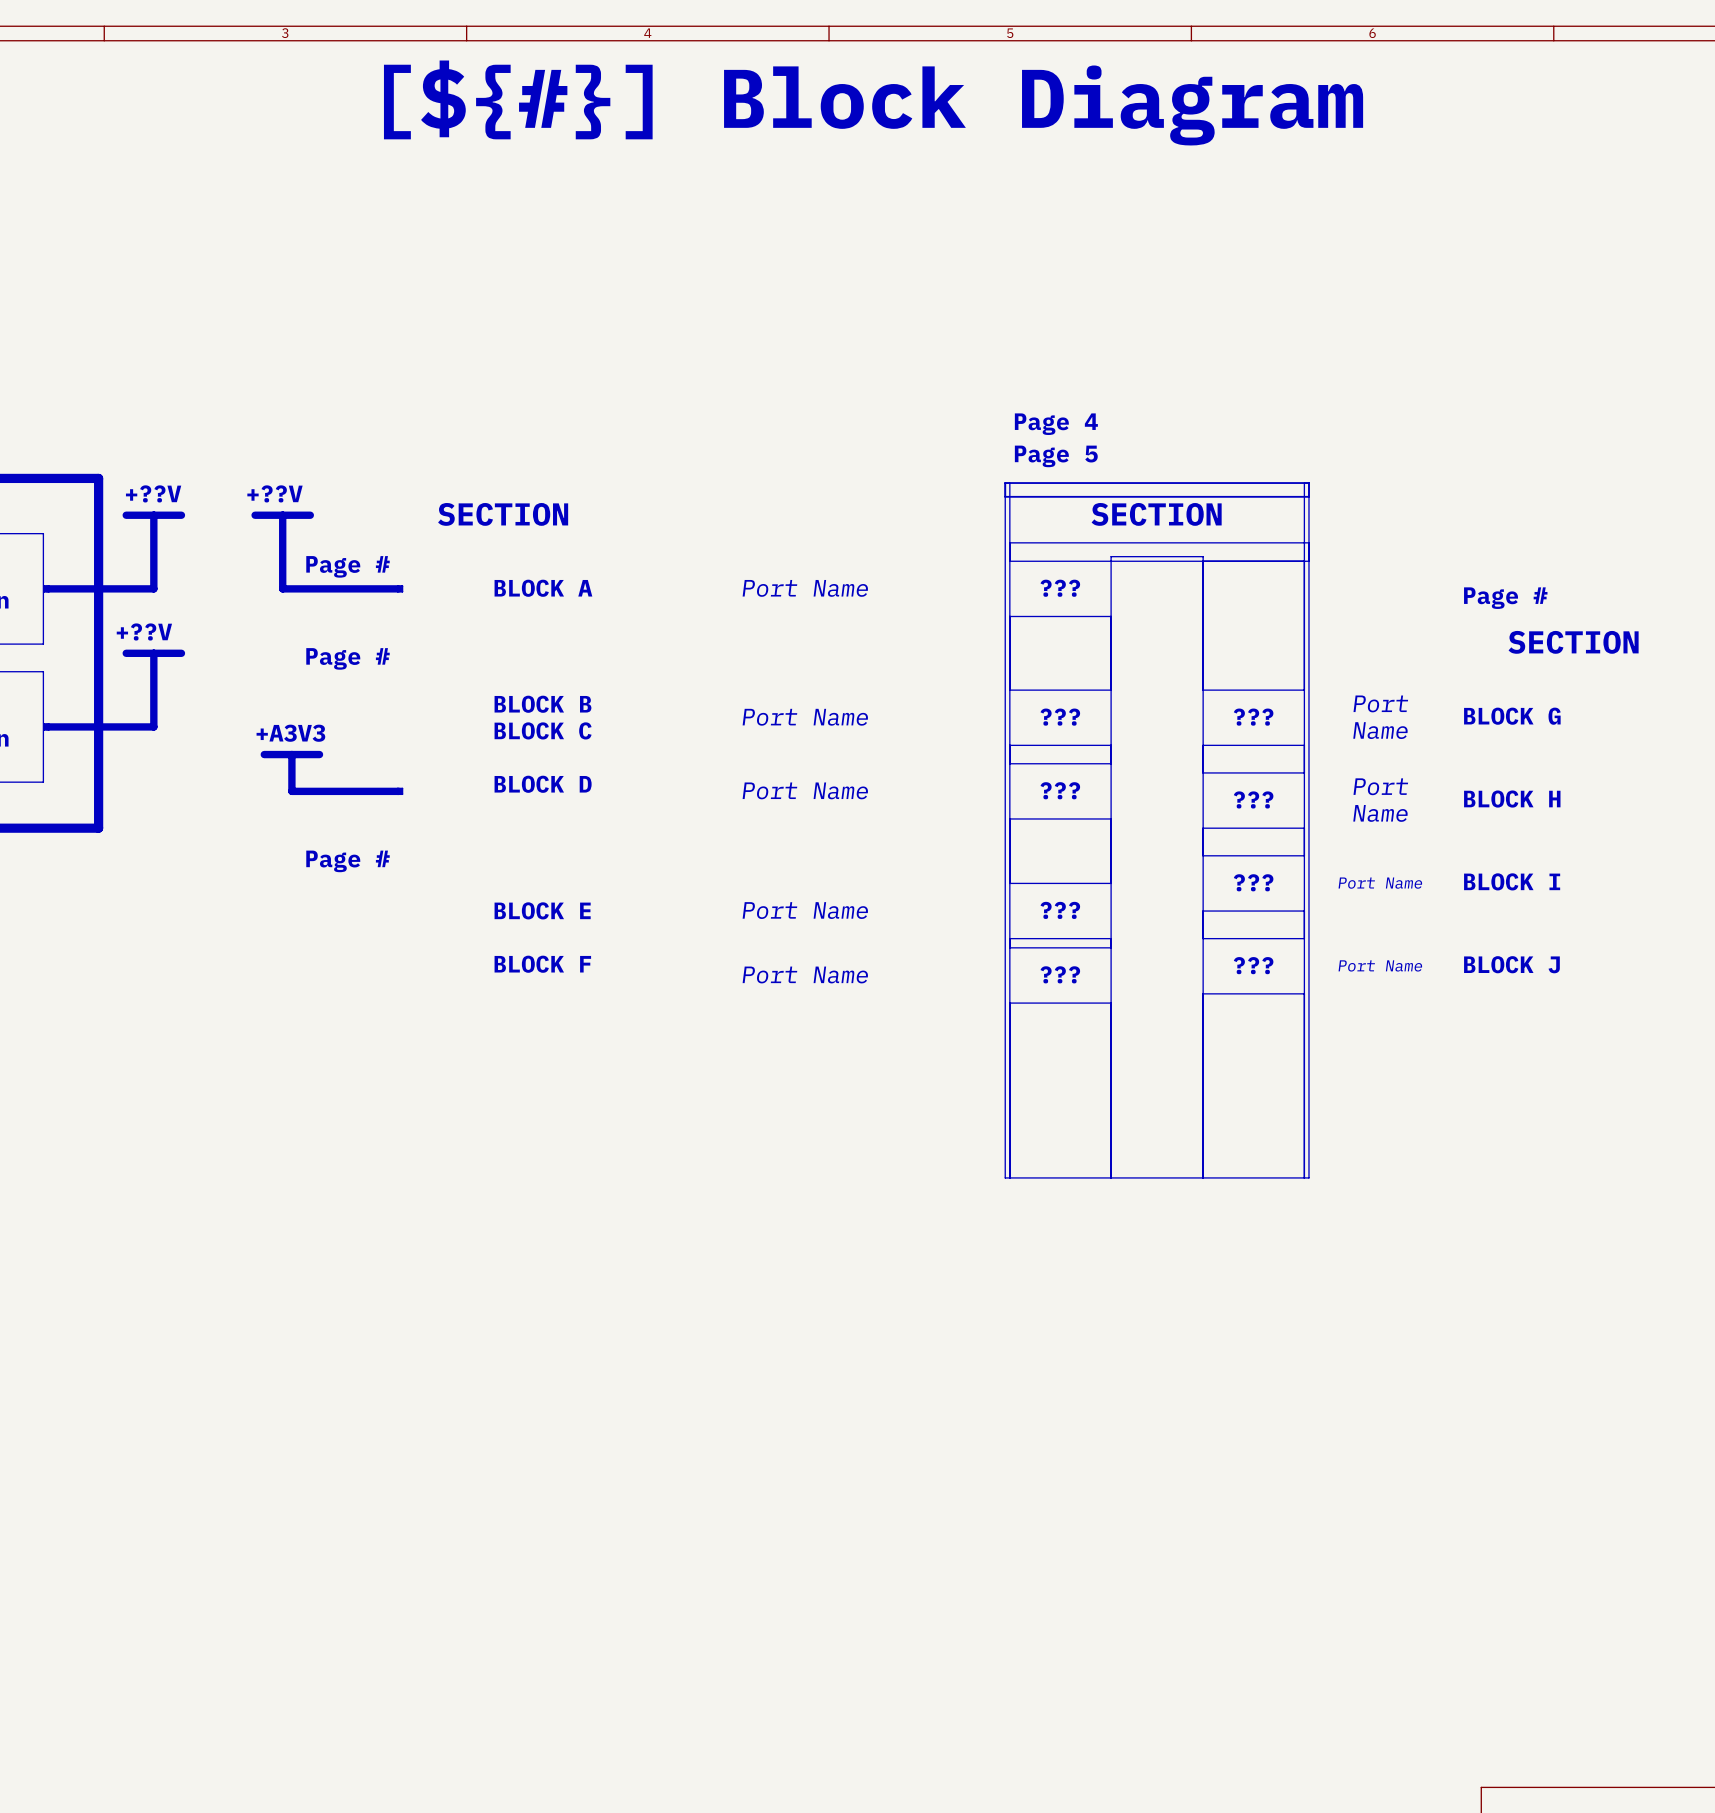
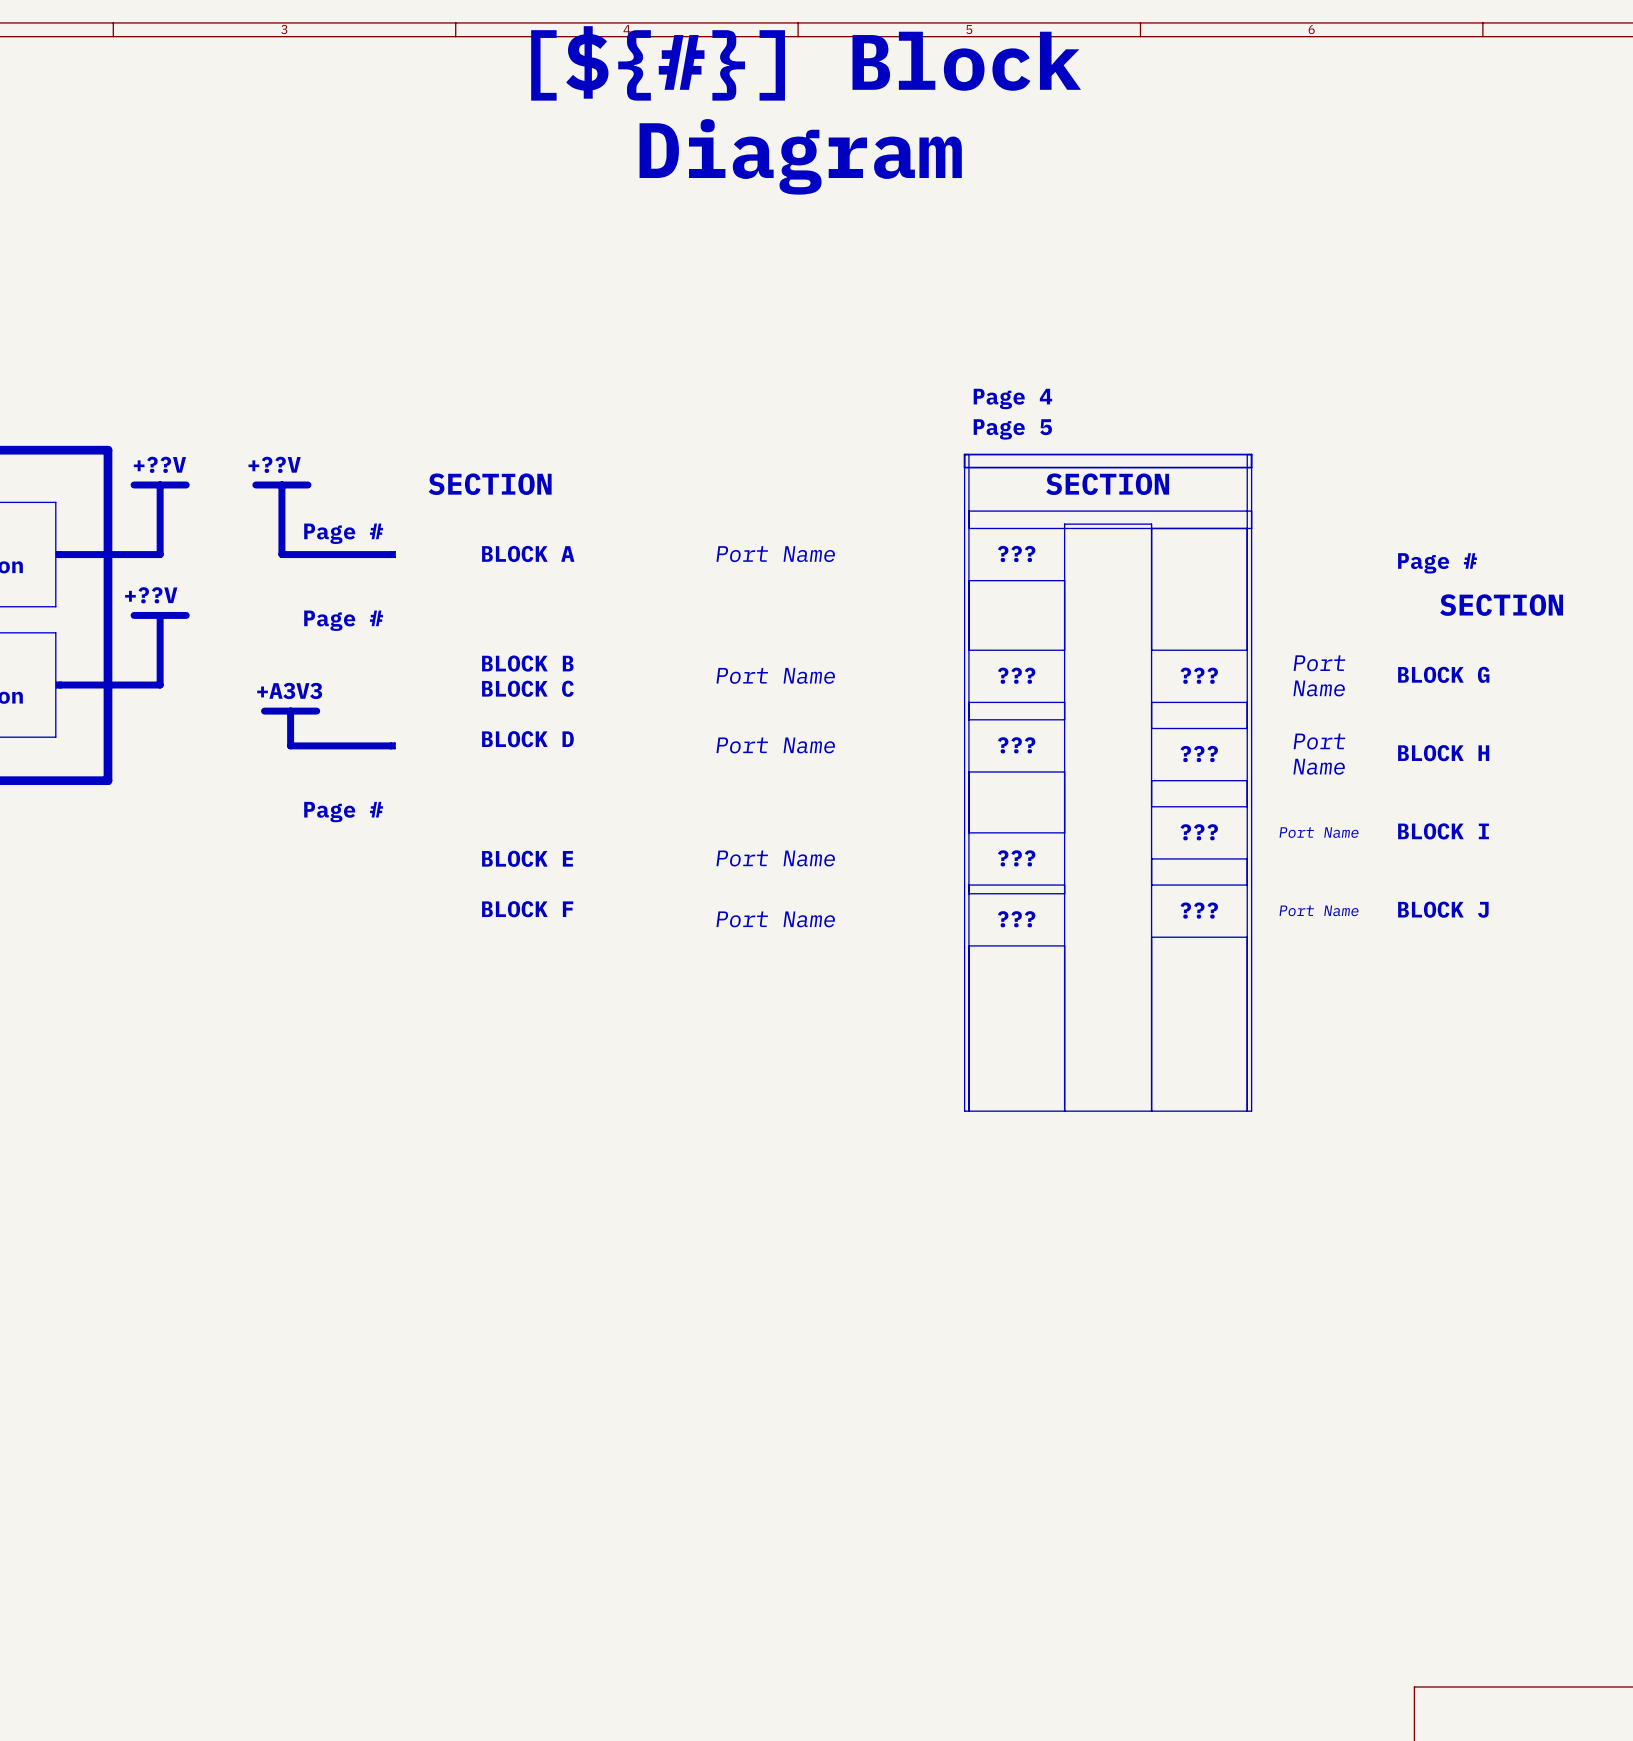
text: [${#}] Block Diagram (873, 102) -> [${#}] Block (806, 63)
text: none -> Diagram (800, 156)

